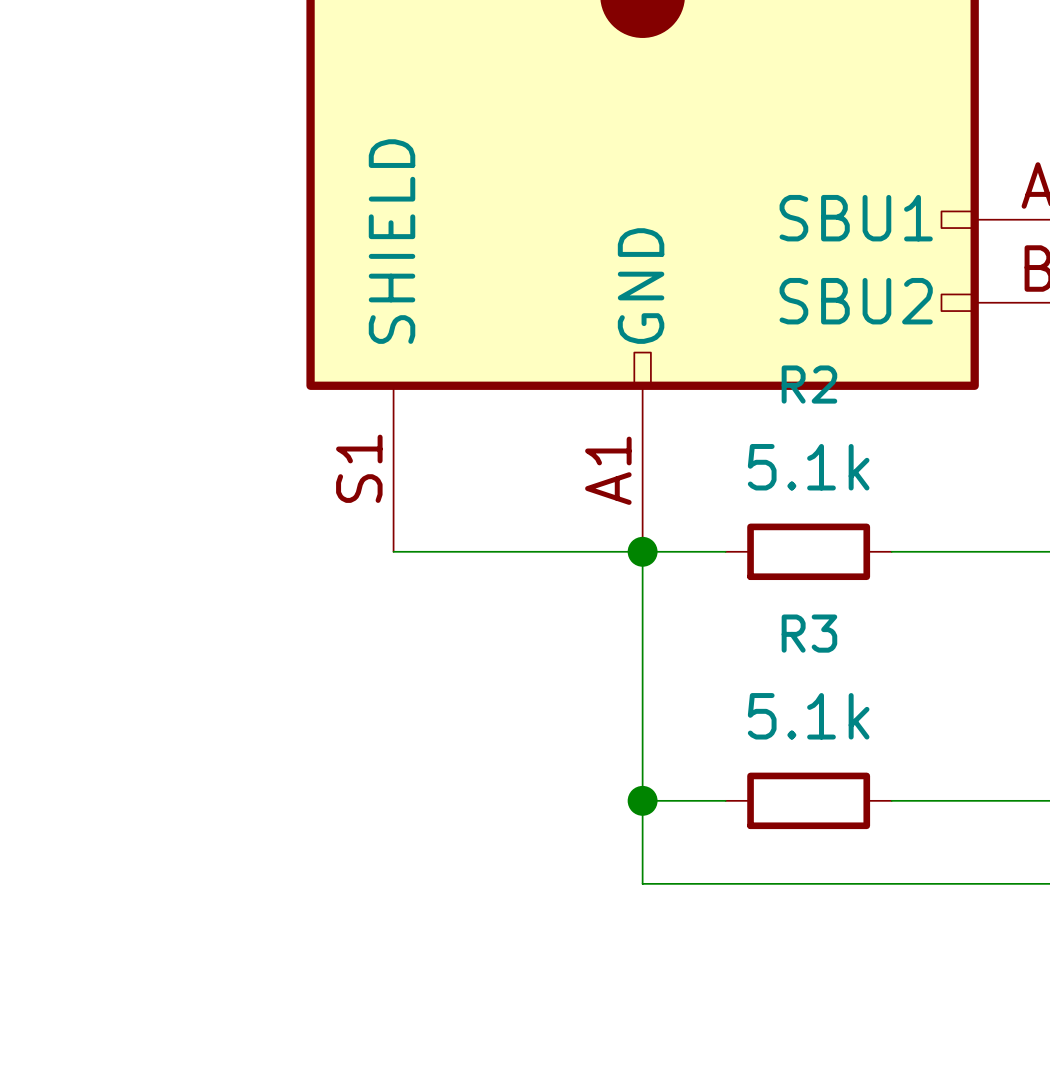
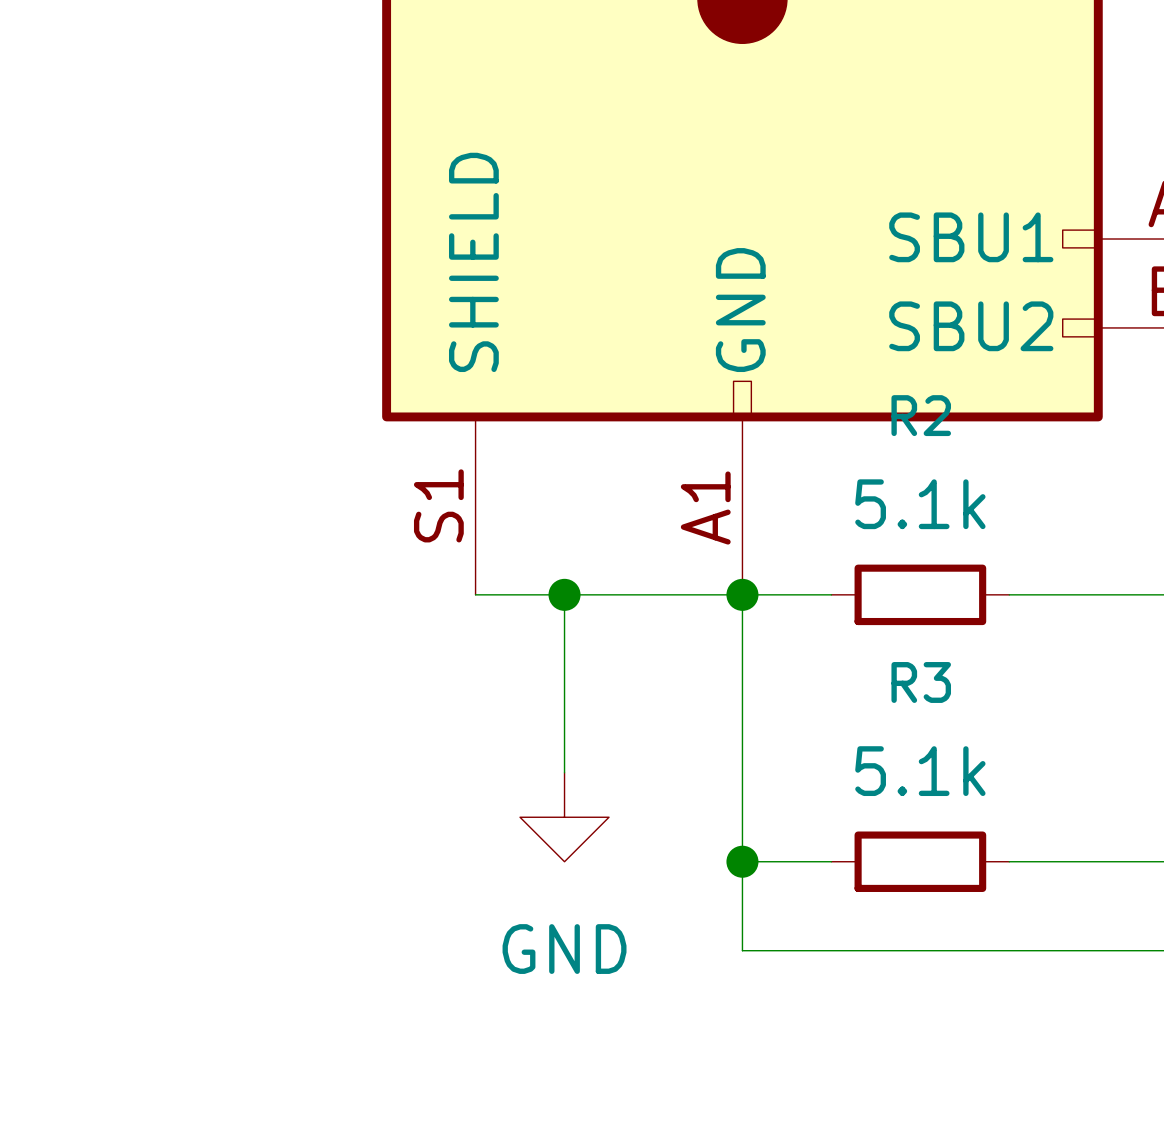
wire: none -> (564, 594) (564, 772)
junction: none -> (564, 594)
power symbol: none -> GND (564, 817)

